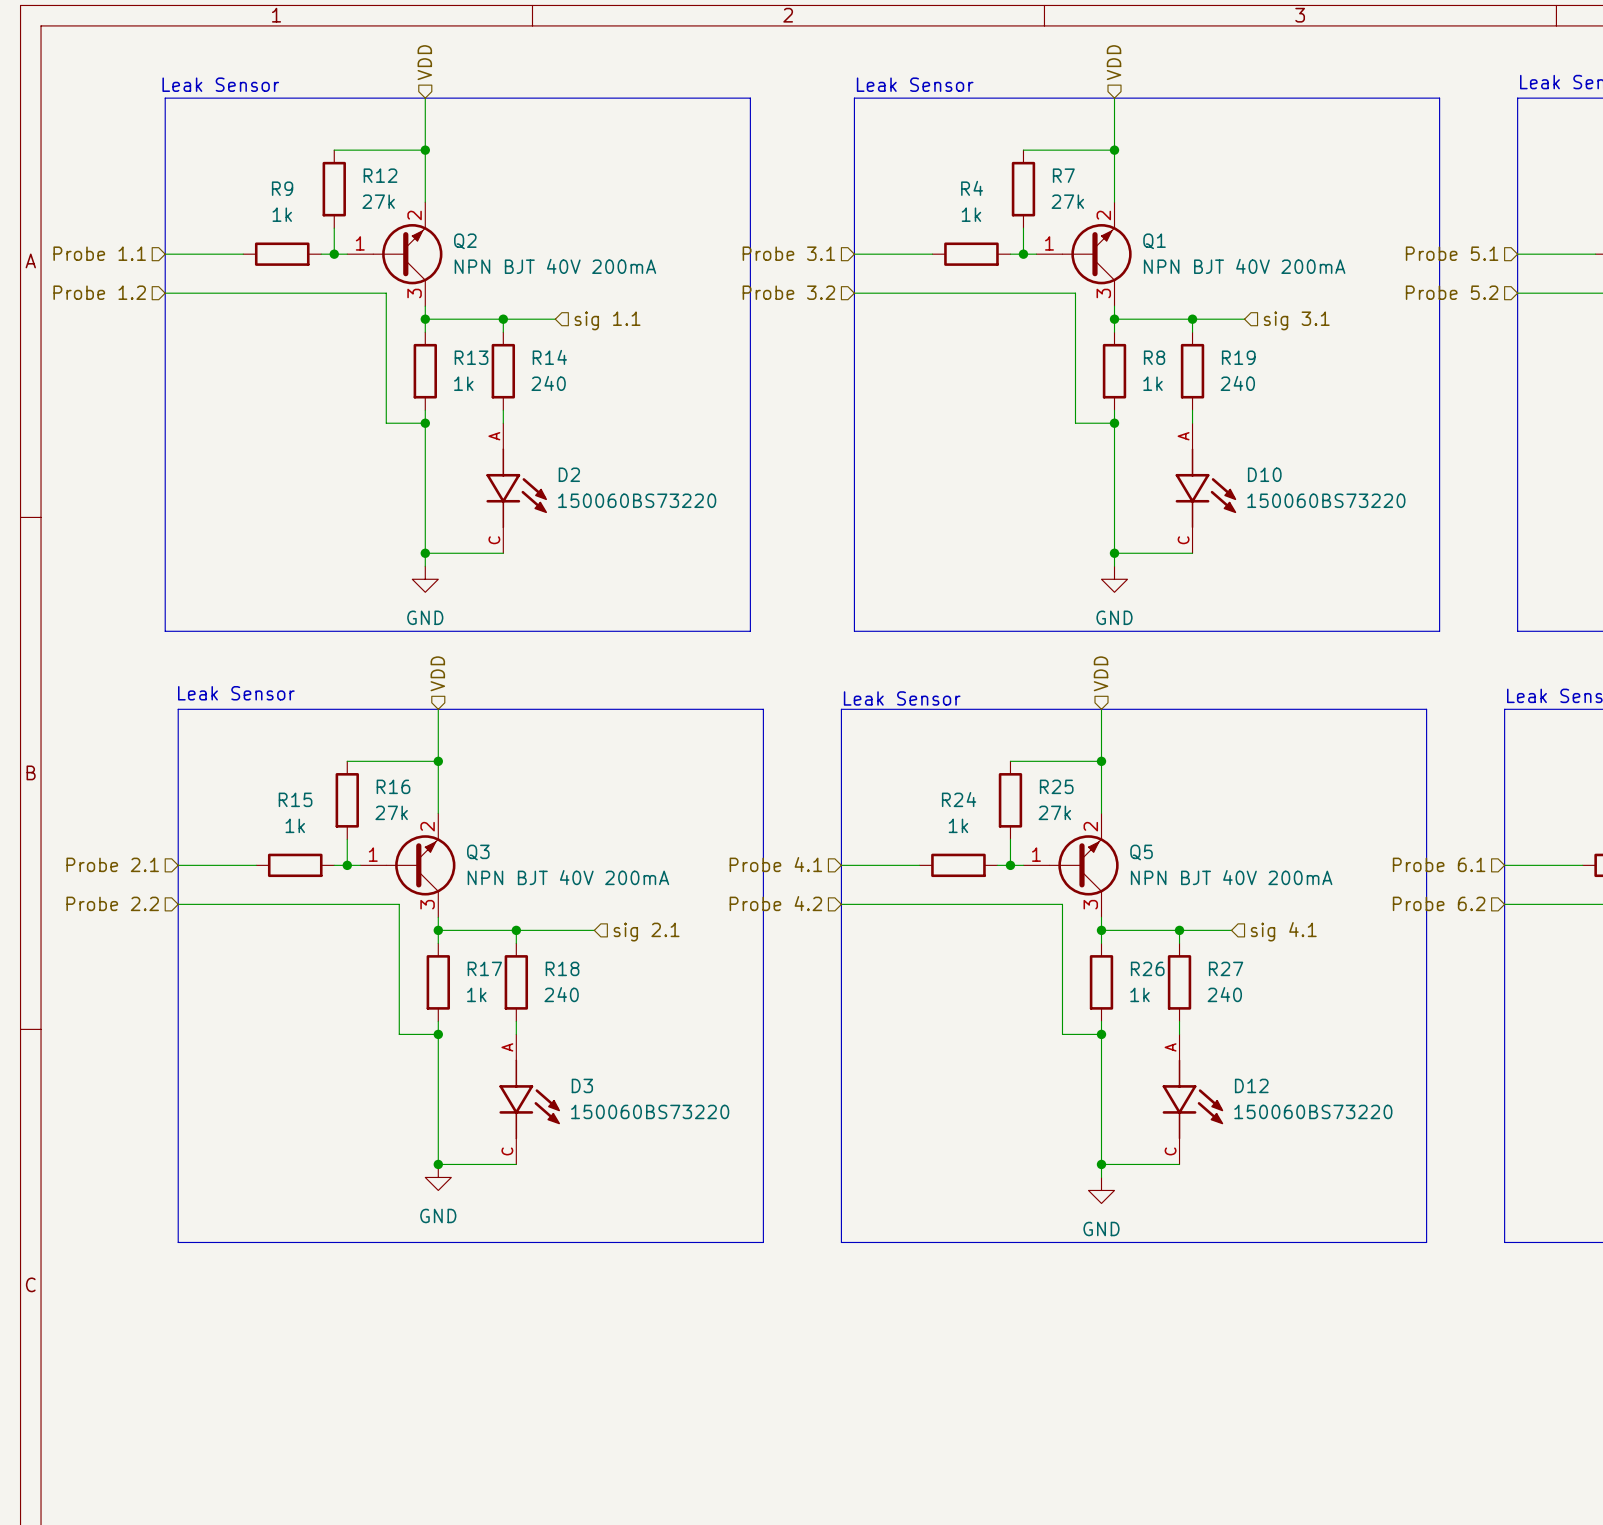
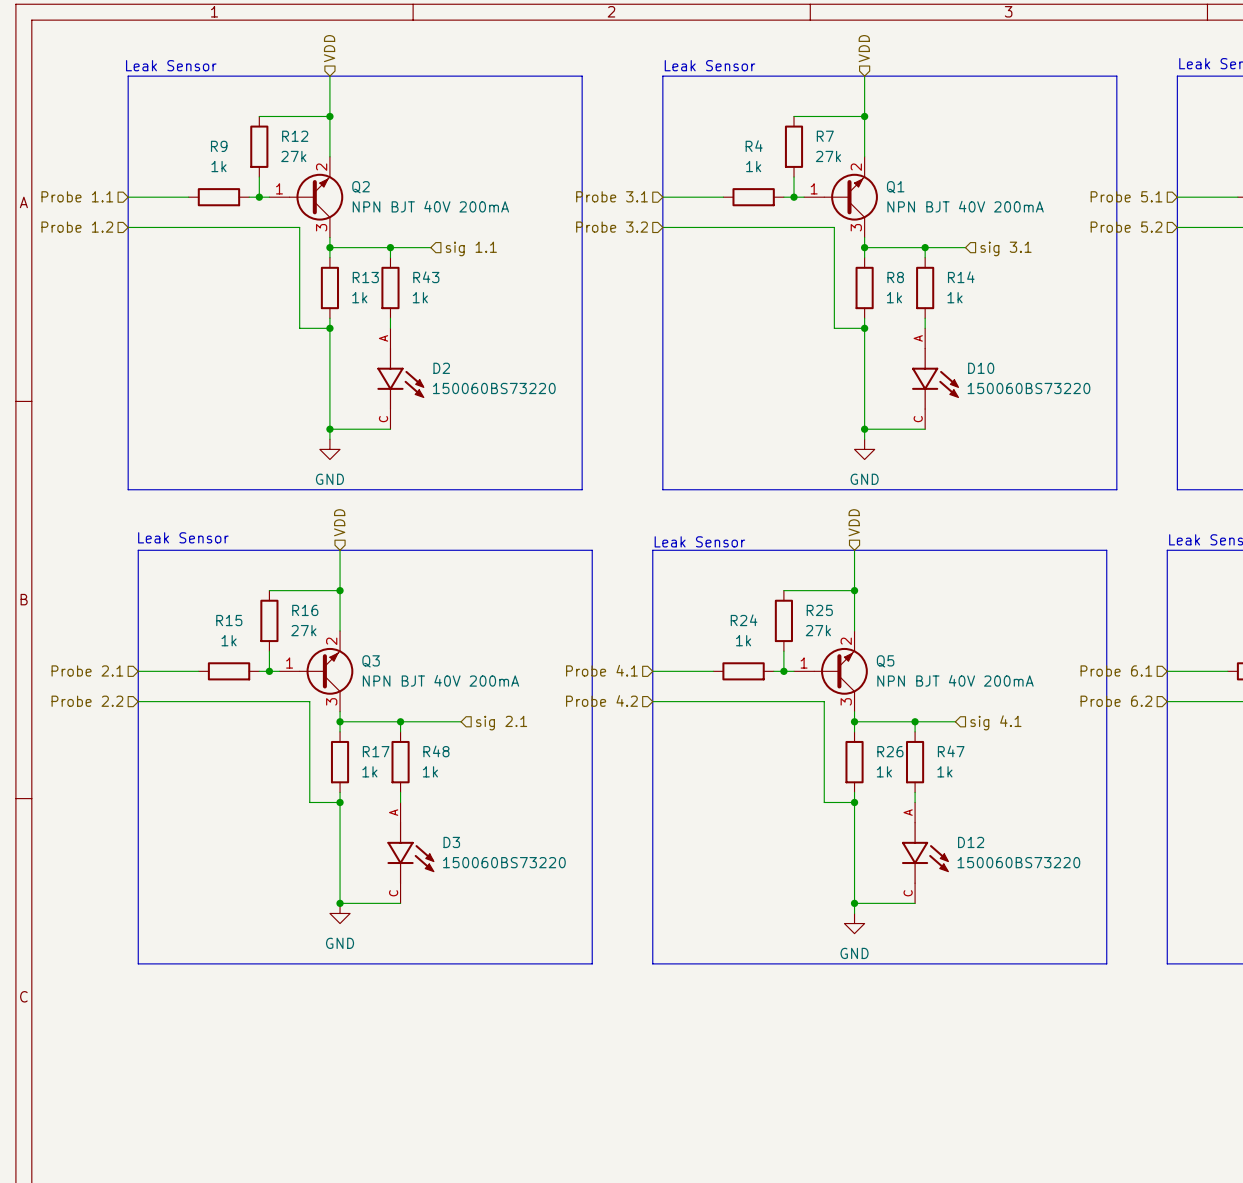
R14 name: R14 (549, 357) -> R43 (426, 277)
R19 name: R19 (1238, 357) -> R14 (961, 277)
R14 value: 240 (548, 383) -> 1k (420, 297)
R19 value: 240 (1237, 383) -> 1k (955, 297)
R18 name: R18 (562, 968) -> R48 (436, 751)
R27 name: R27 (1226, 968) -> R47 (951, 751)
R18 value: 240 (561, 994) -> 1k (430, 771)
R27 value: 240 (1224, 994) -> 1k (944, 771)

